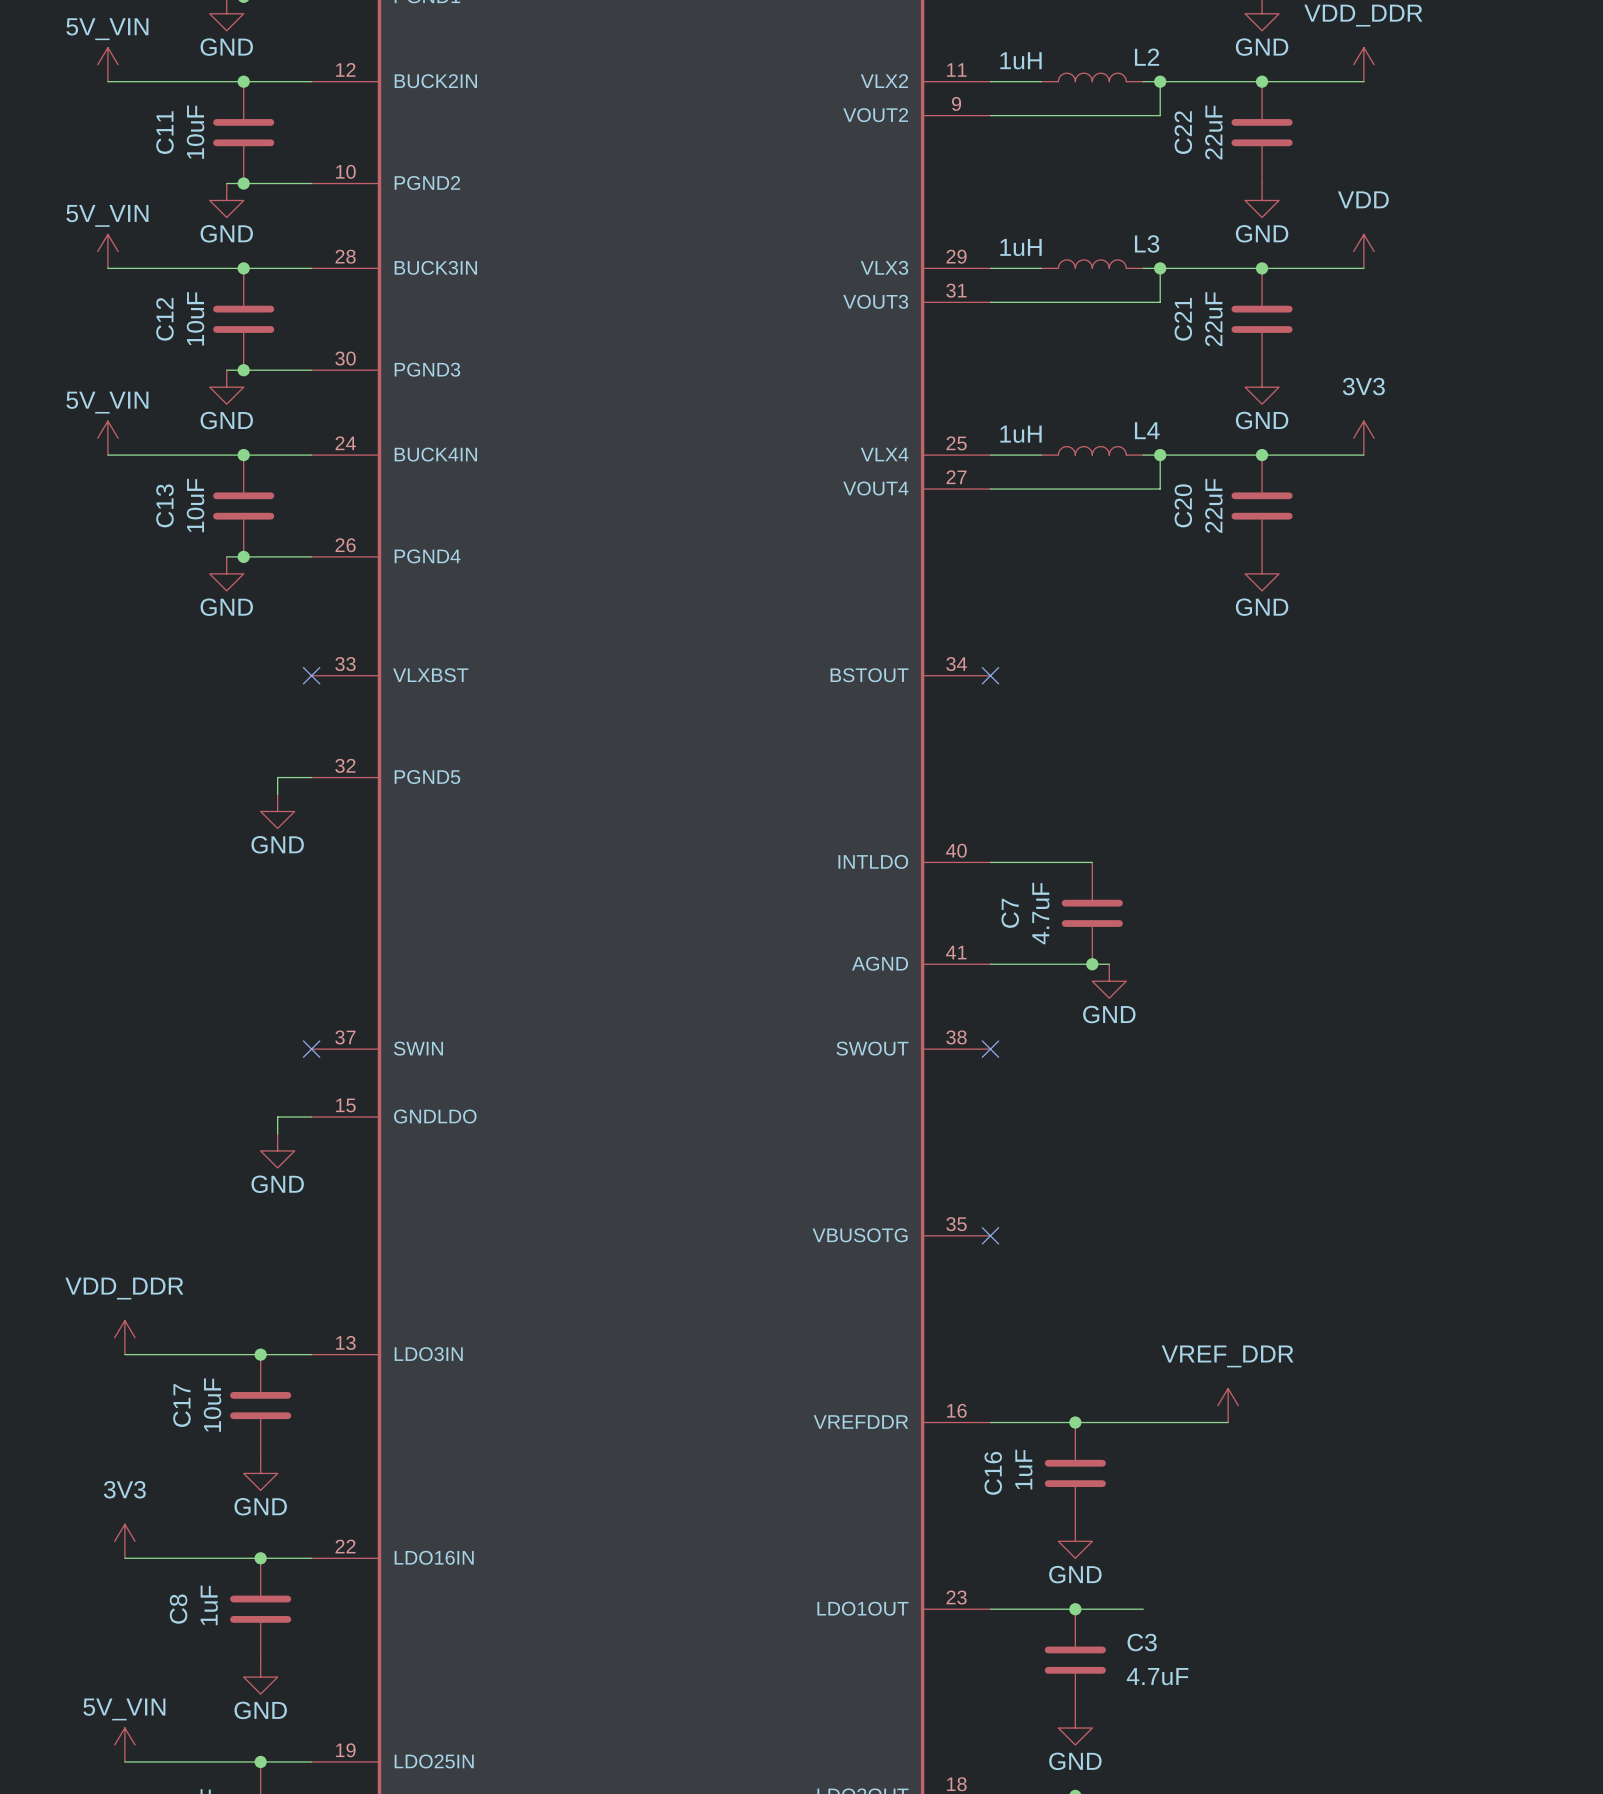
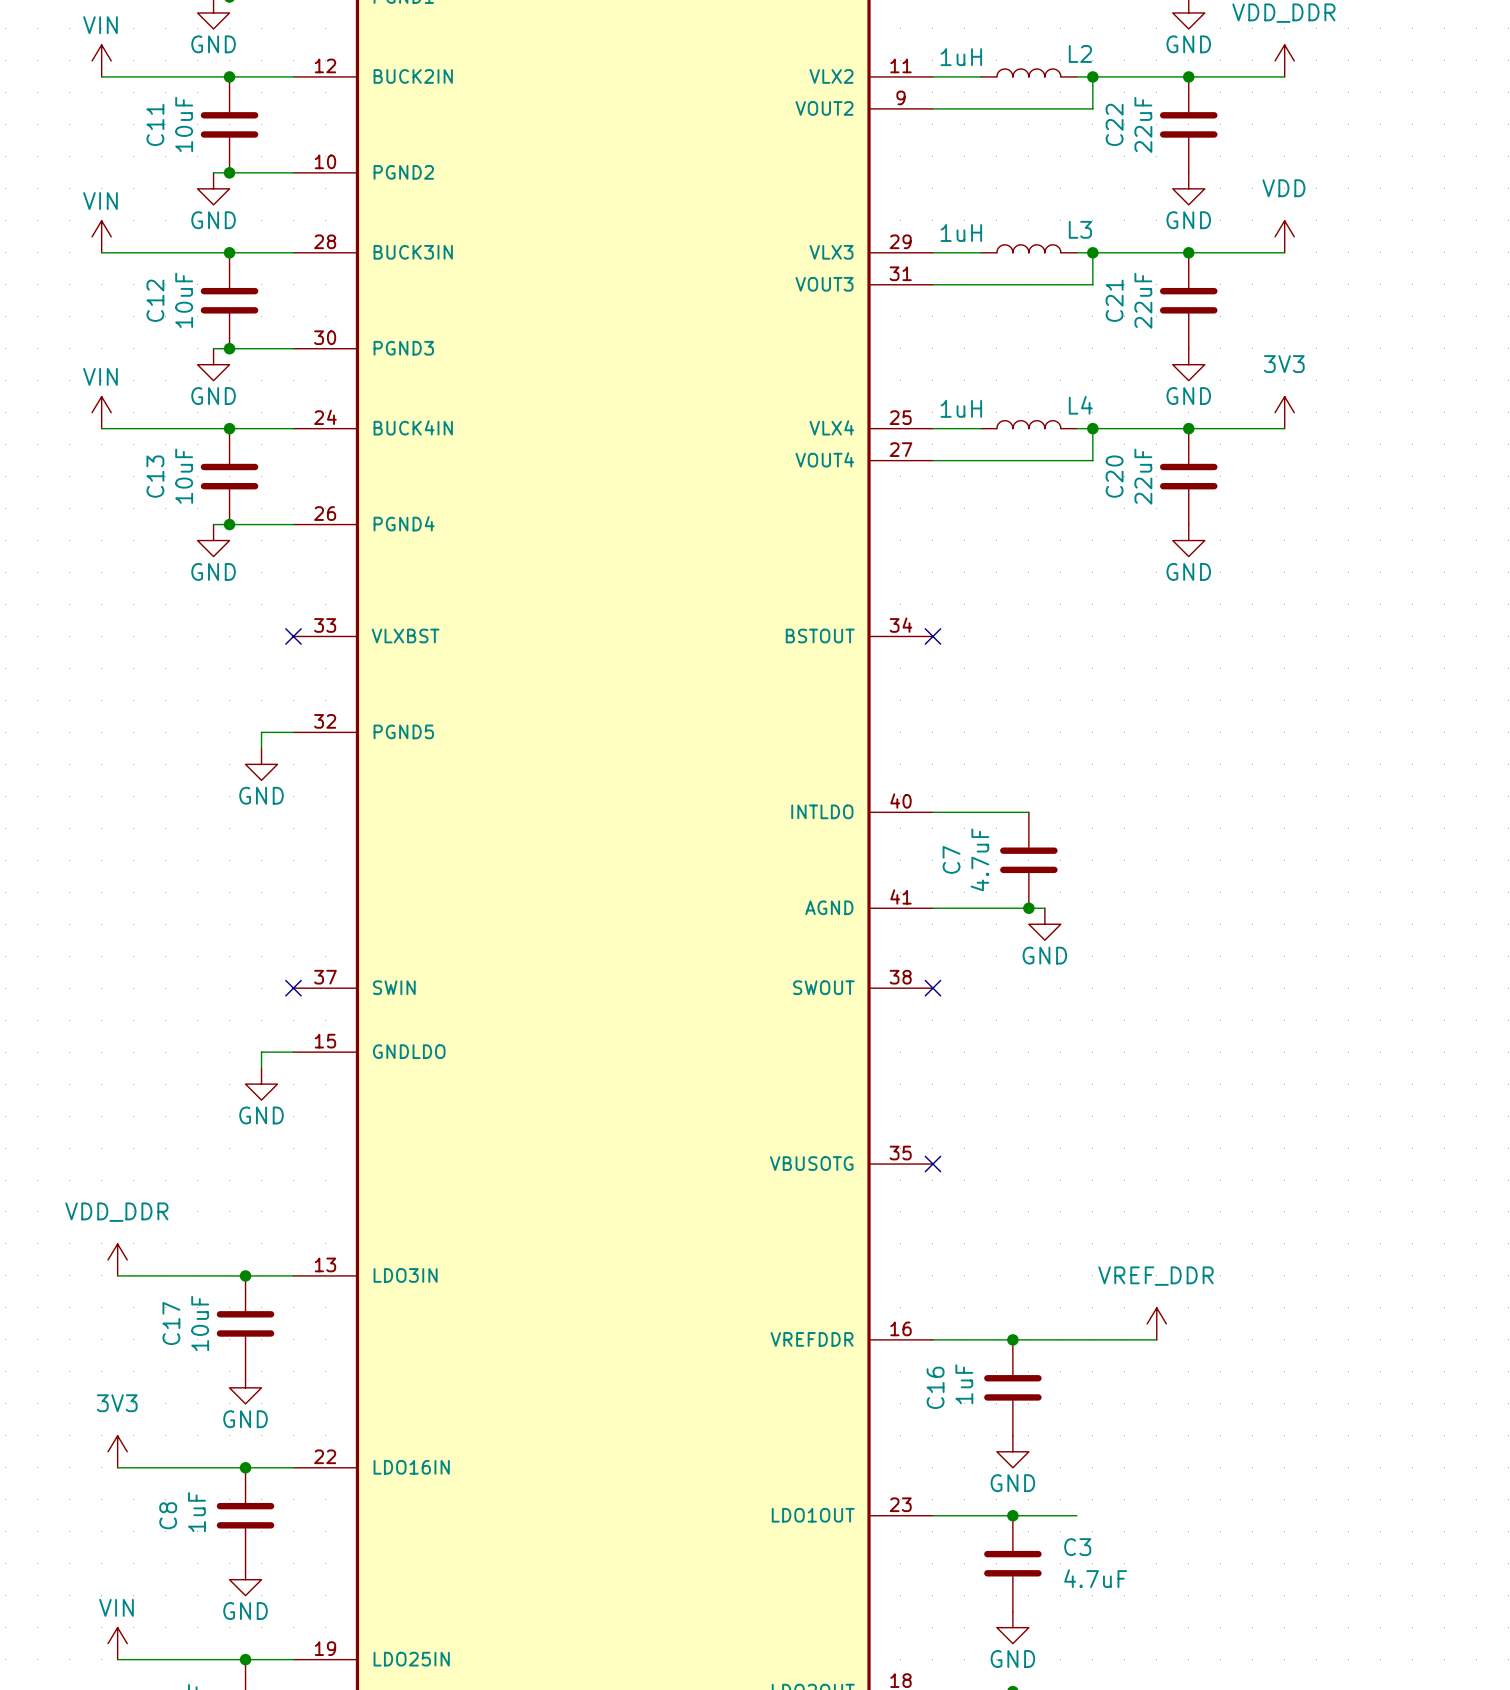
power symbol: 5V_VIN (107, 64) -> VIN (101, 60)
power symbol: 5V_VIN (107, 251) -> VIN (101, 236)
power symbol: 5V_VIN (107, 438) -> VIN (101, 412)
power symbol: 5V_VIN (124, 1744) -> VIN (117, 1643)

